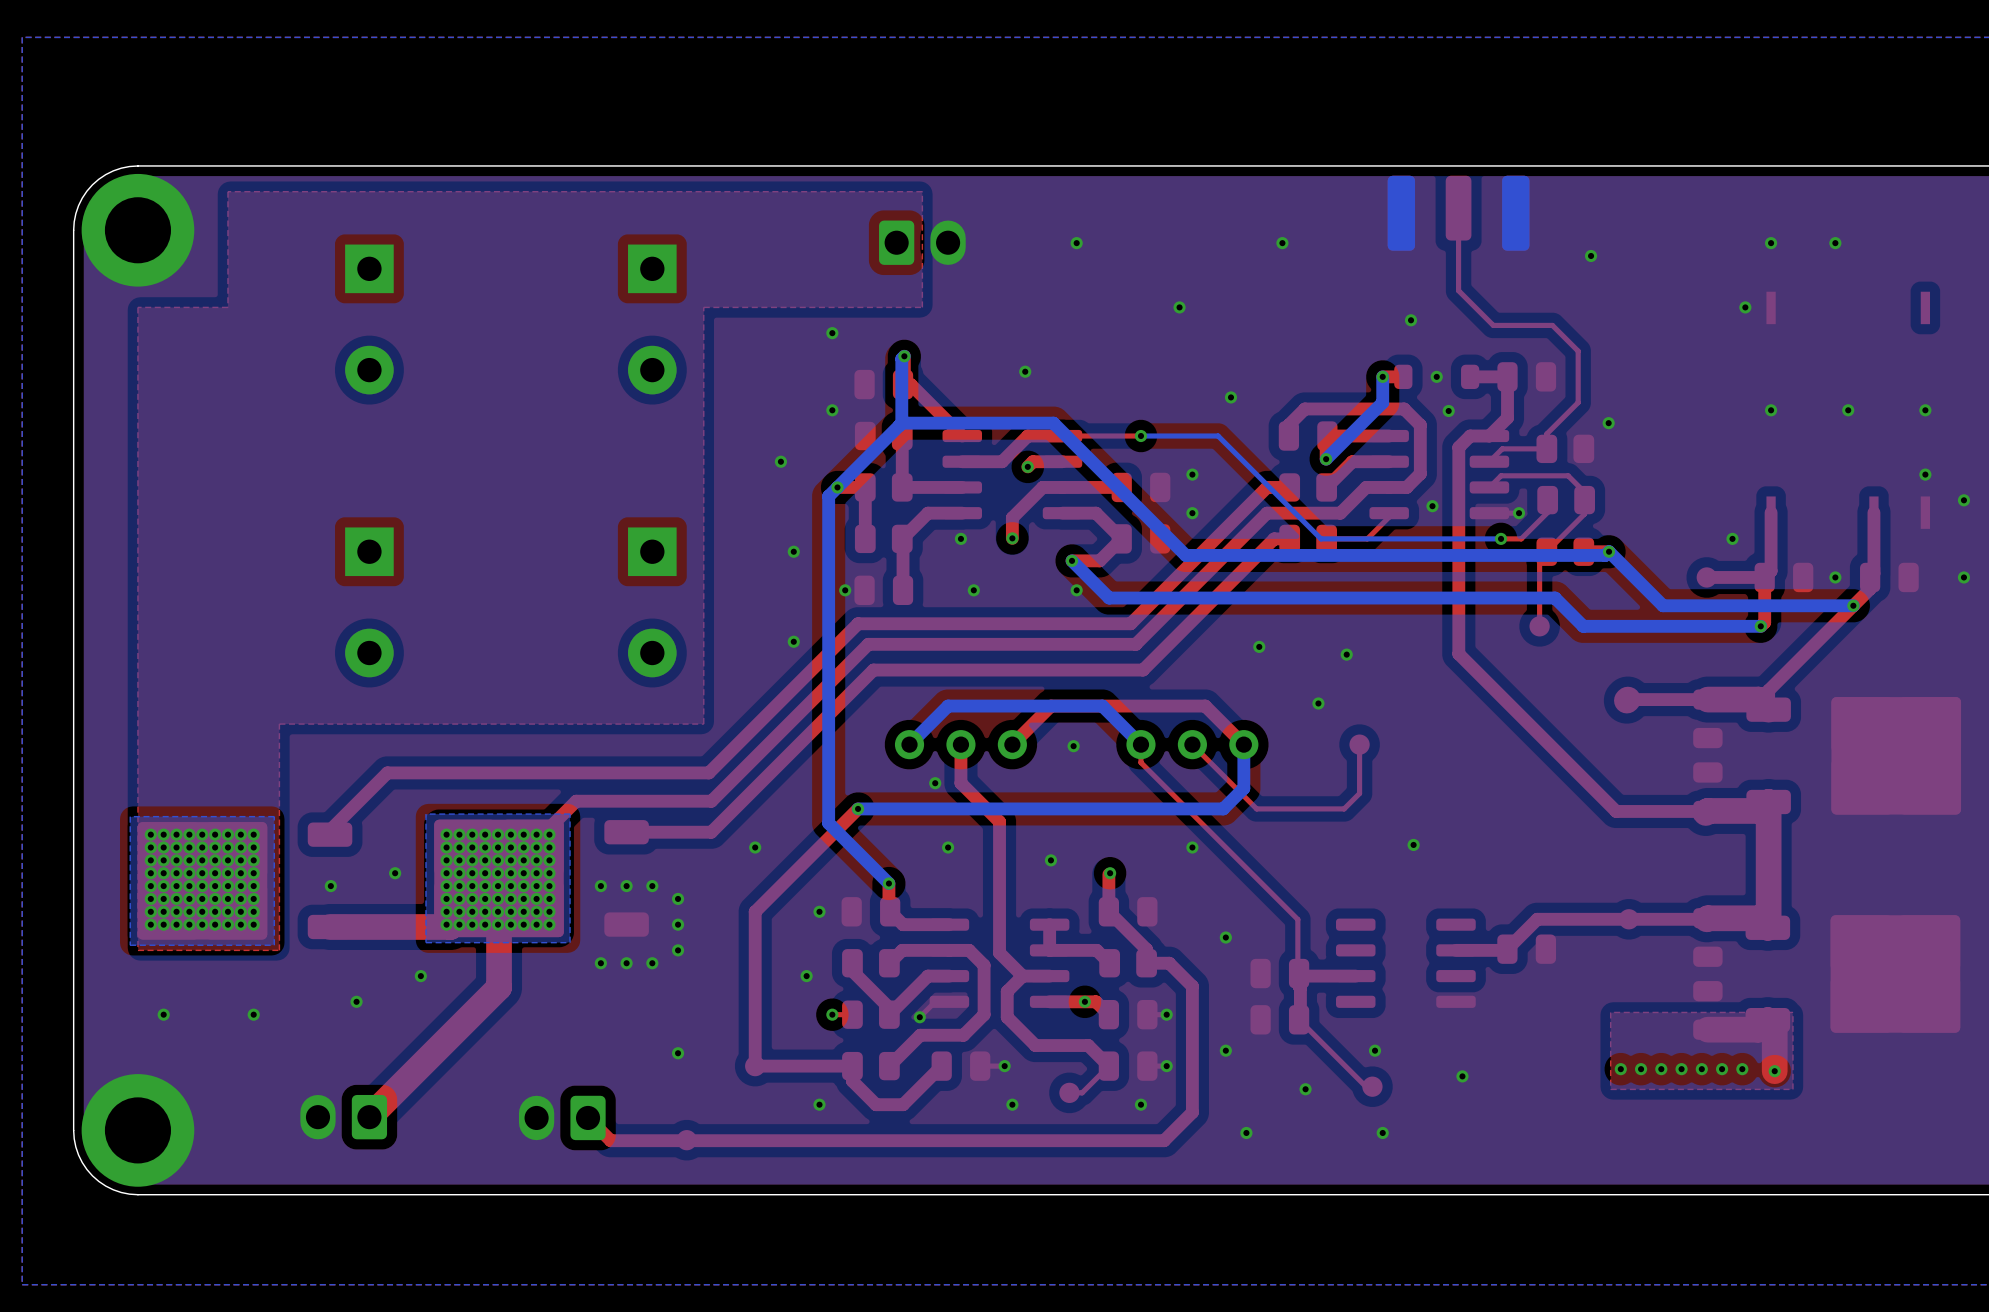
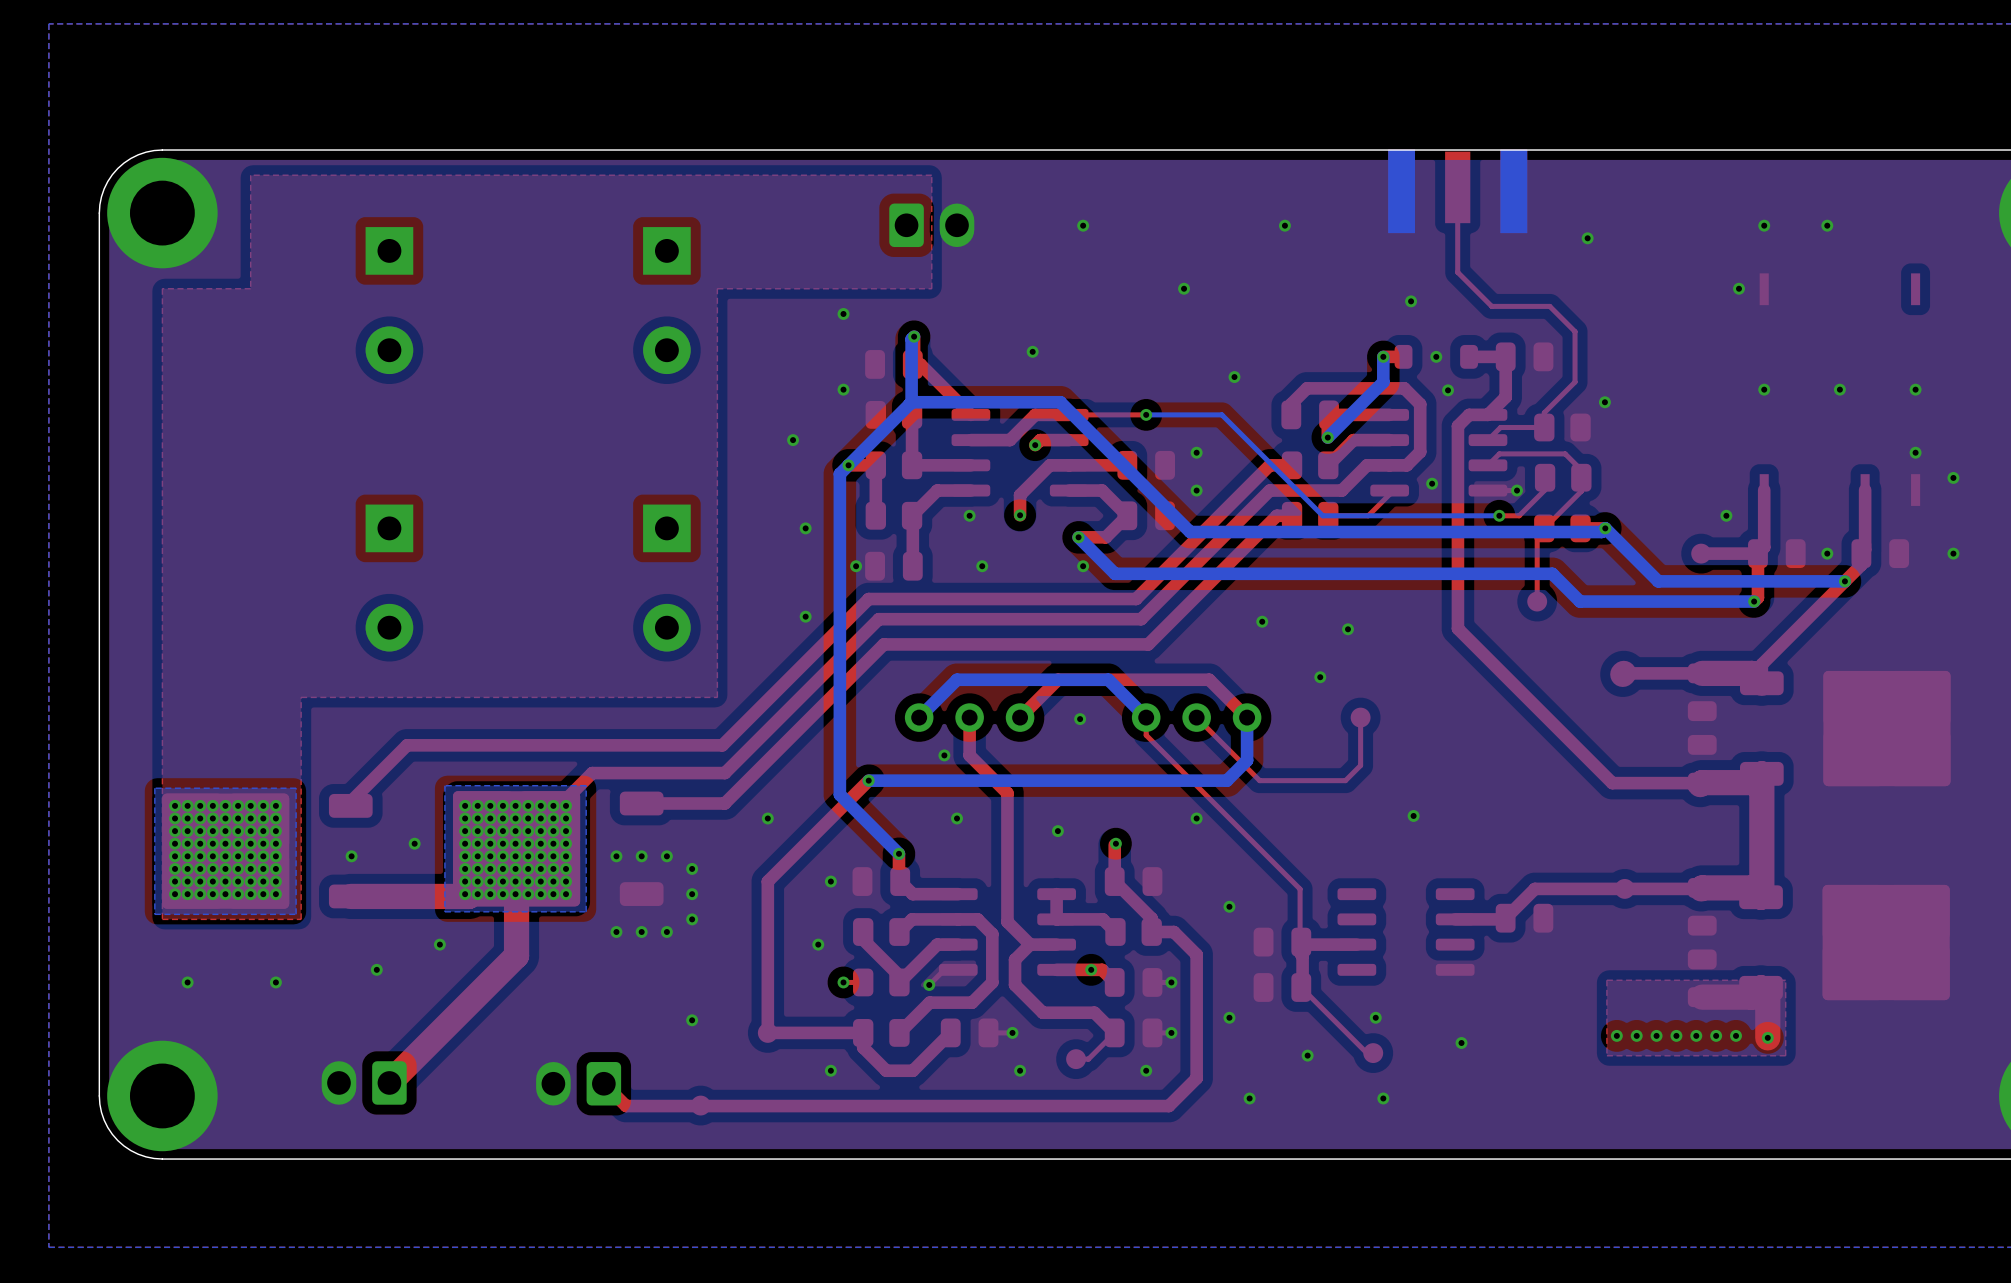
part footprint: [1387, 175, 1530, 251] -> [1388, 149, 1528, 234]

